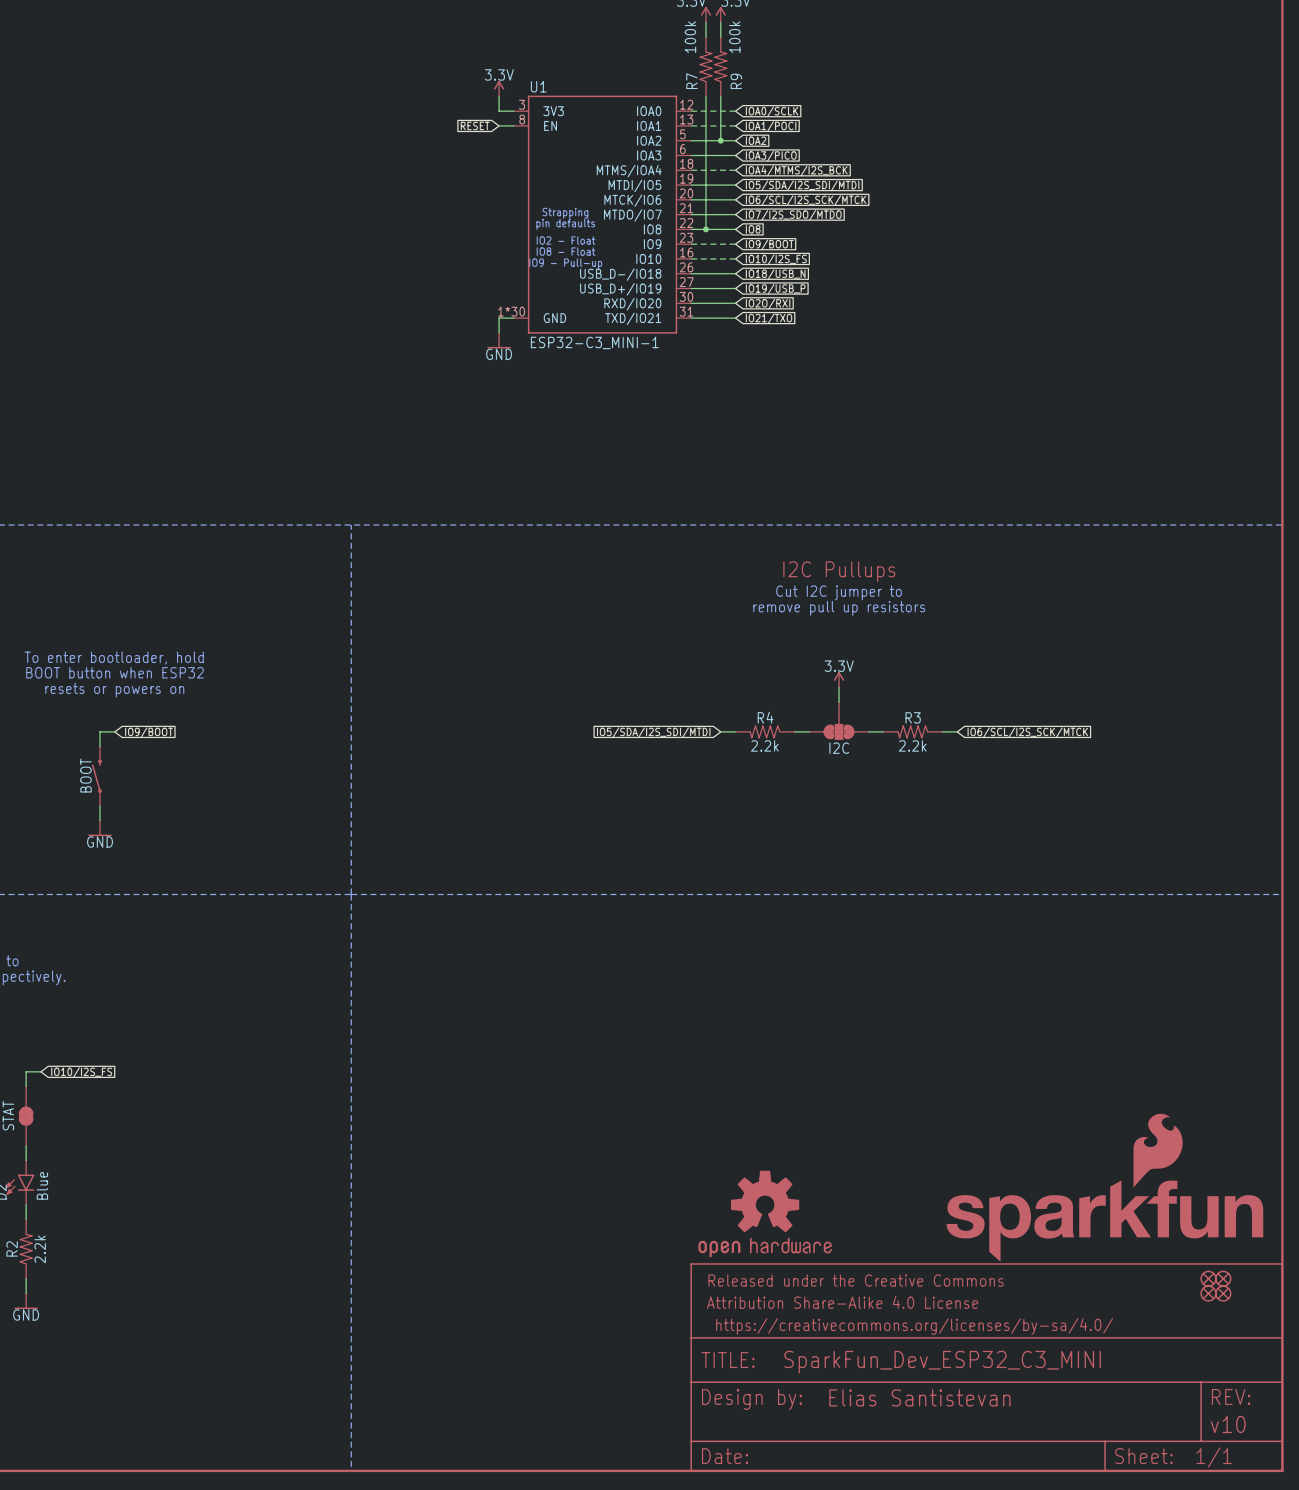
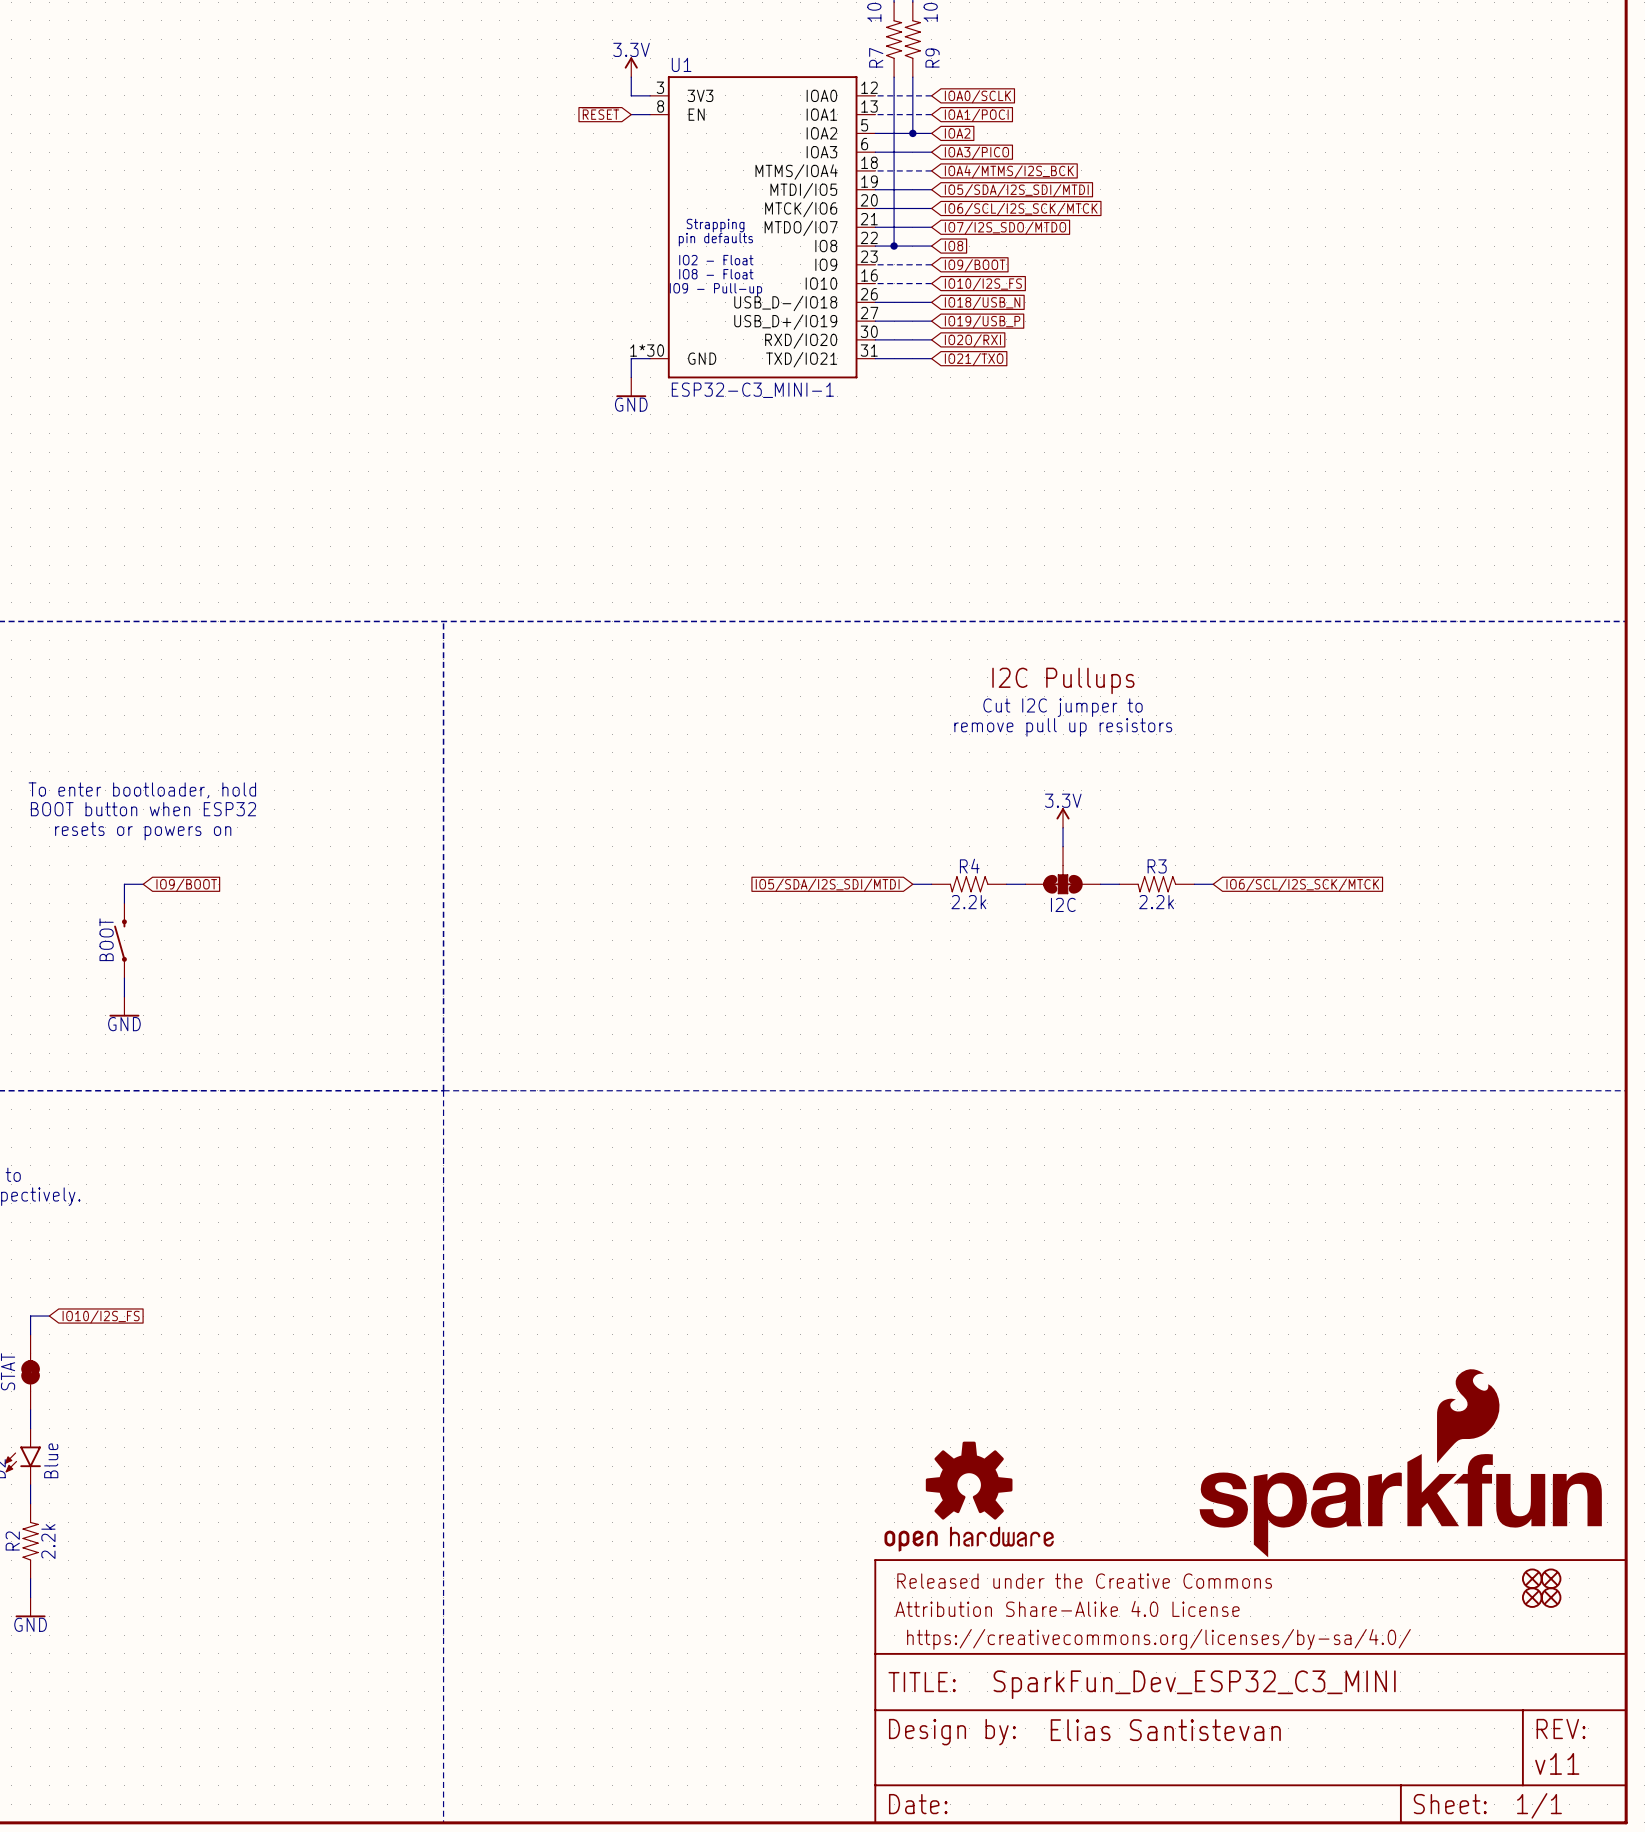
part text: v10 (1228, 1424) -> v11 (1557, 1763)

